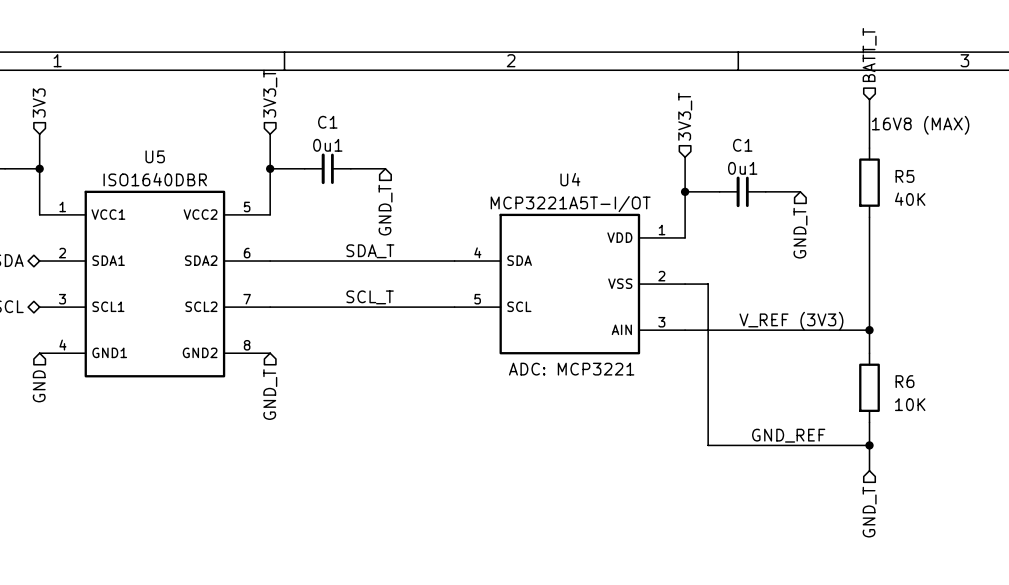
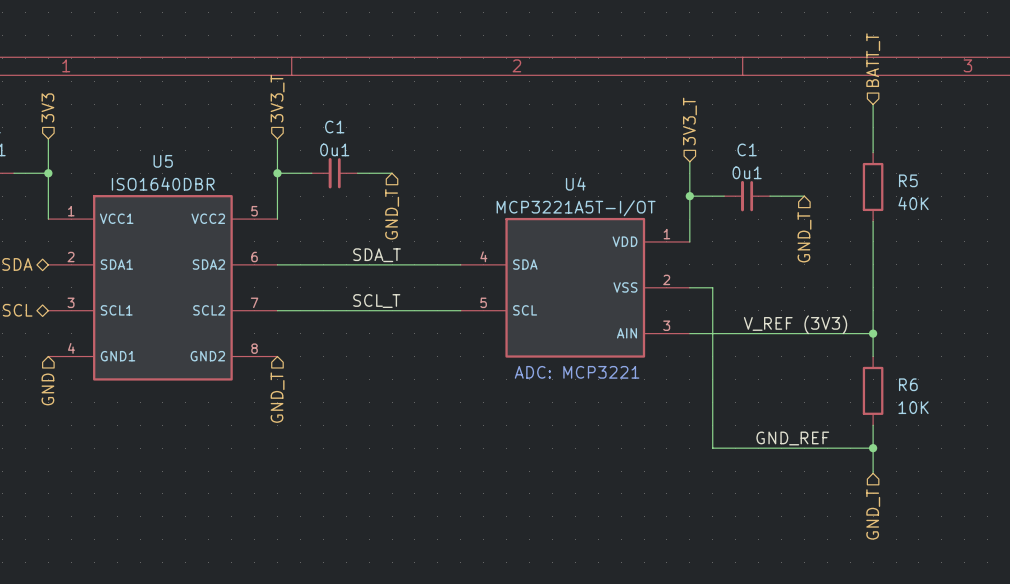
label: 16V8 (MAX) (920, 125) -> none

